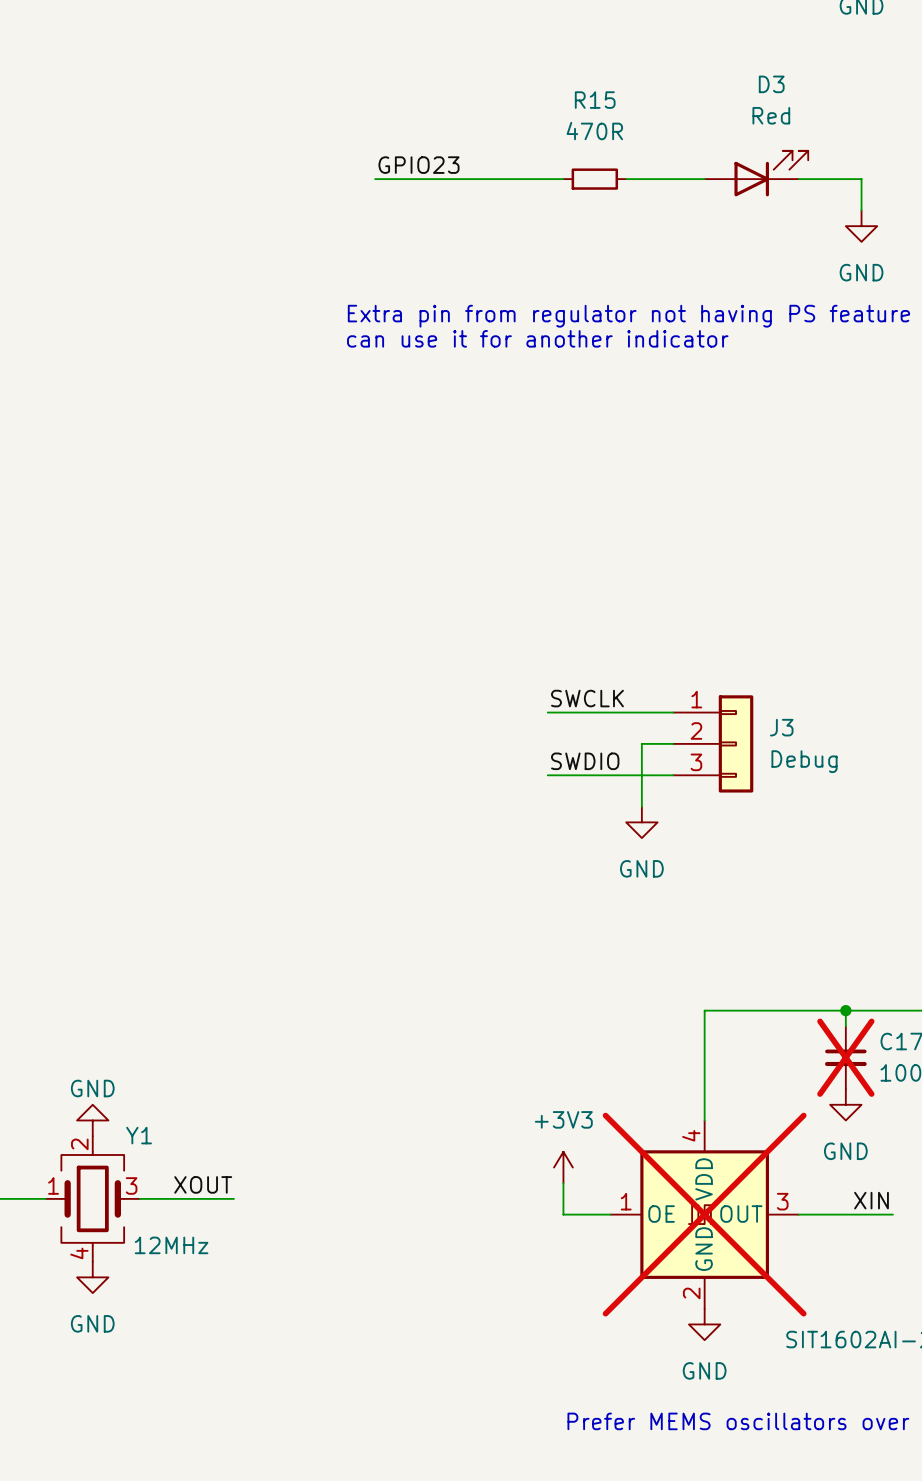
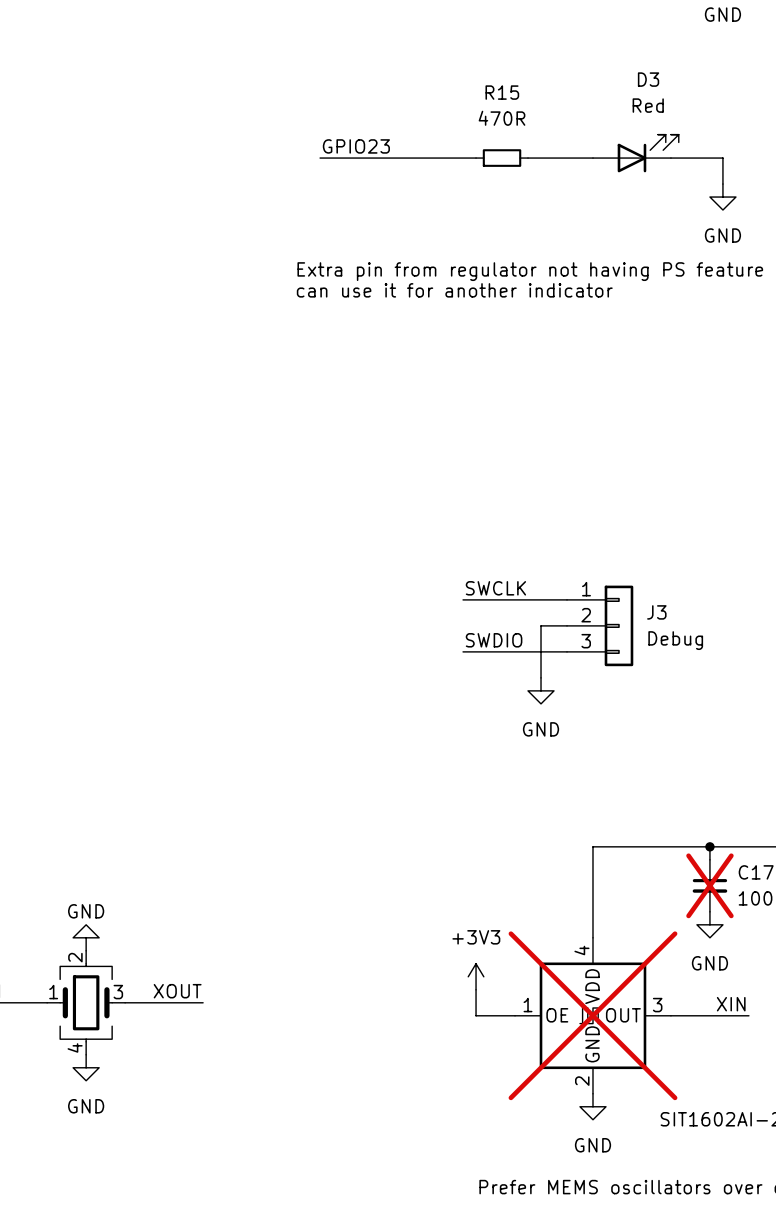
Y1 name: Y1 (139, 1135) -> none
Y1 value: 12MHz (171, 1245) -> none

